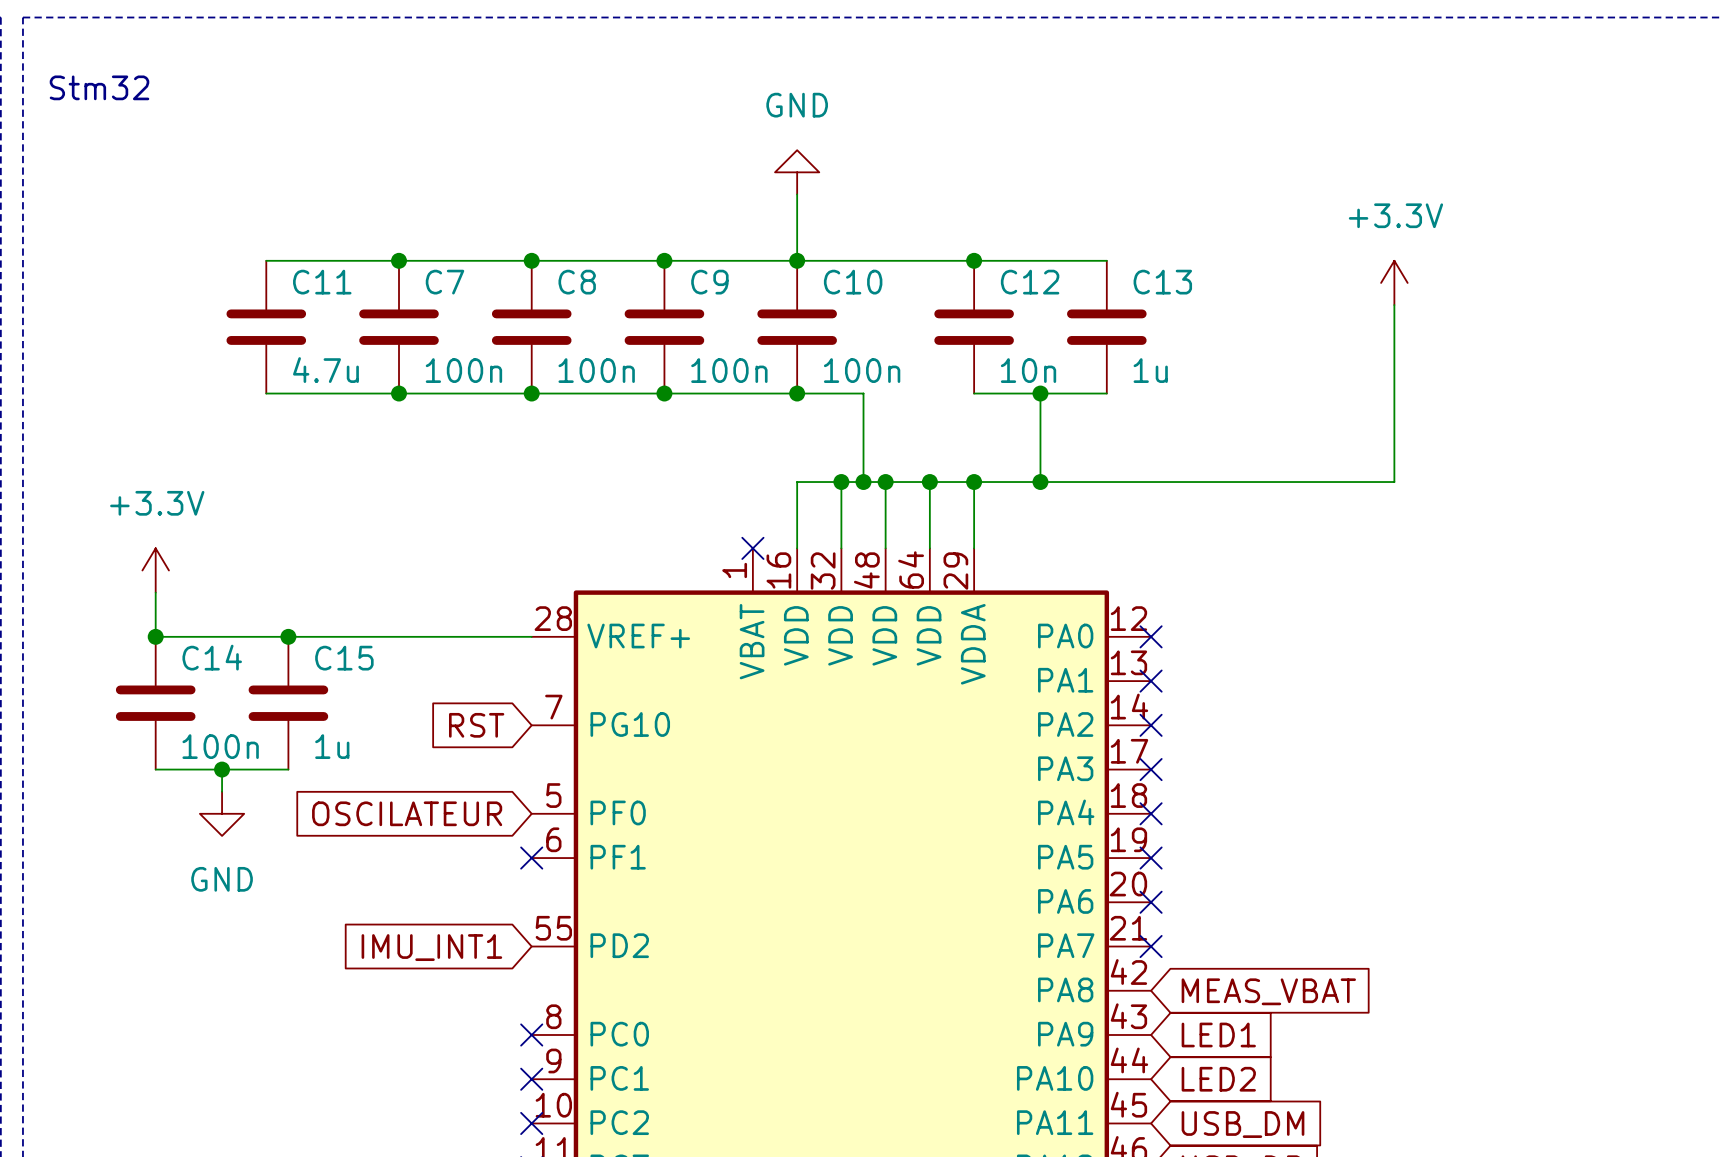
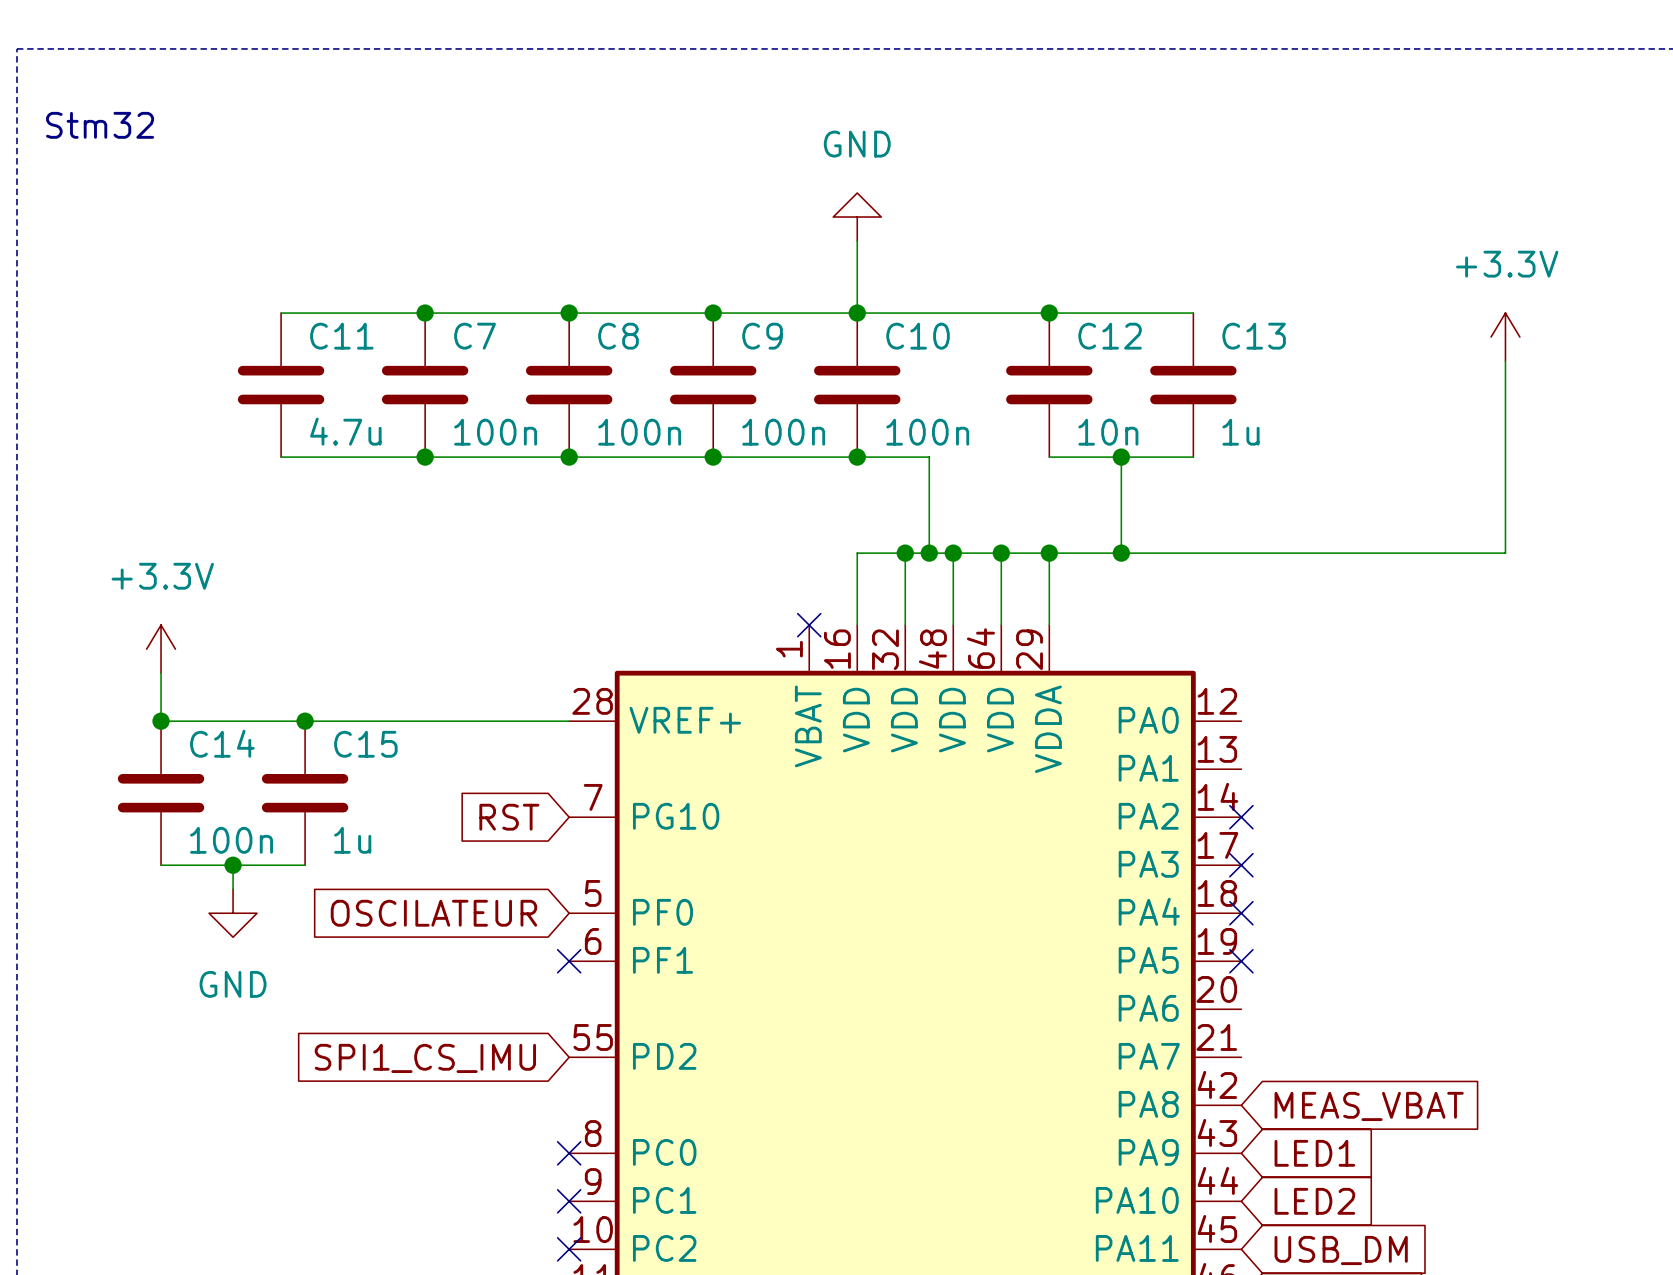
no-connect mark: (1151, 636) -> none
no-connect mark: (1151, 681) -> none
no-connect mark: (1151, 902) -> none
no-connect mark: (1151, 946) -> none
global label: IMU_INT1 (431, 947) -> SPI1_CS_IMU (425, 1058)

